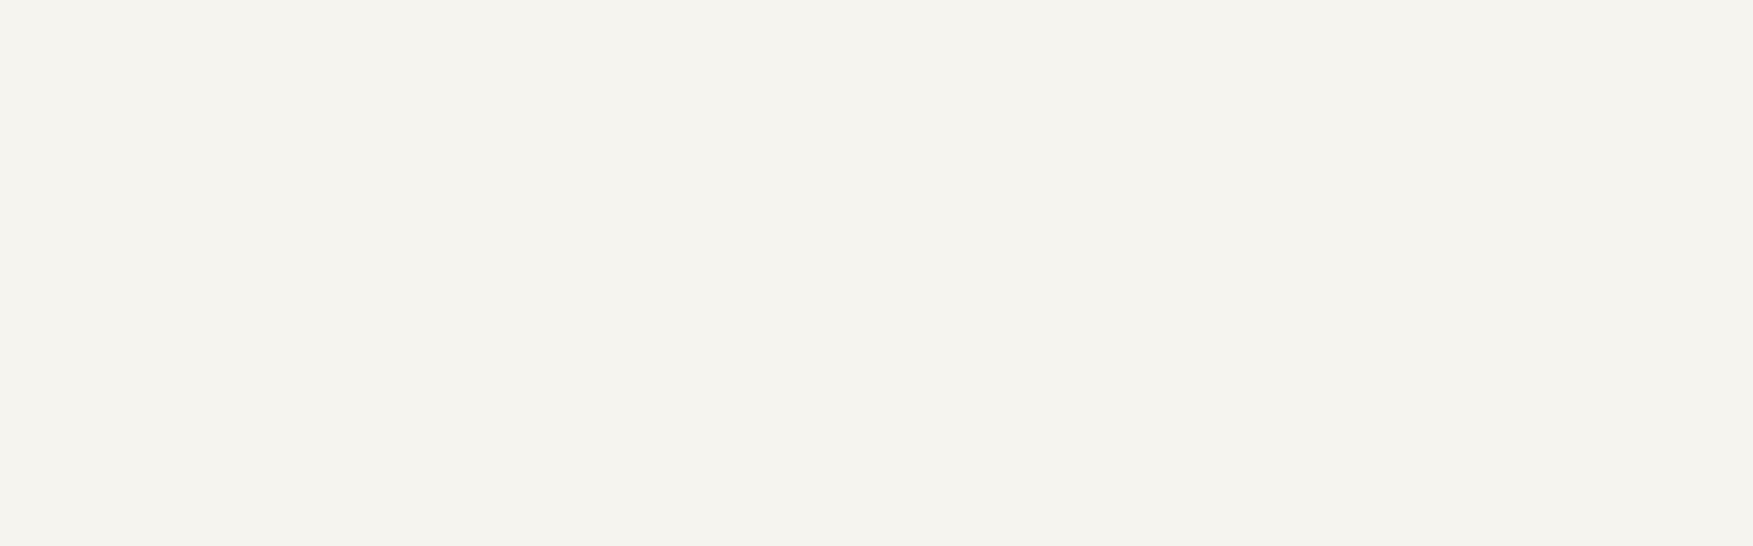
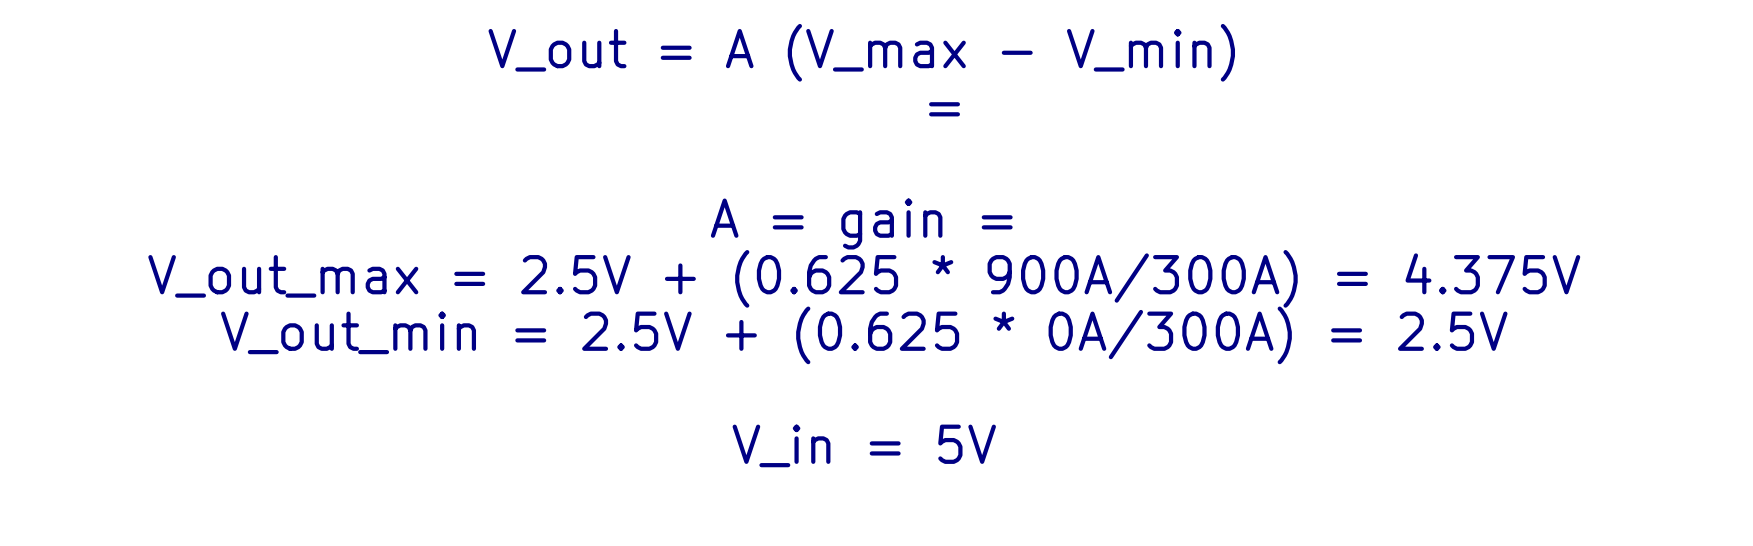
text: none -> V_out = A (V_max - V_min) (861, 52)
text: none -> = (944, 109)
text: none -> A = gain = (861, 224)
text: none -> V_out_max = 2.5V + (0.625 * 900A/300A) = 4.375V (864, 278)
text: none -> V_out_min = 2.5V + (0.625 * 0A/300A) = 2.5V (864, 335)
text: none -> V_in = 5V (864, 445)

